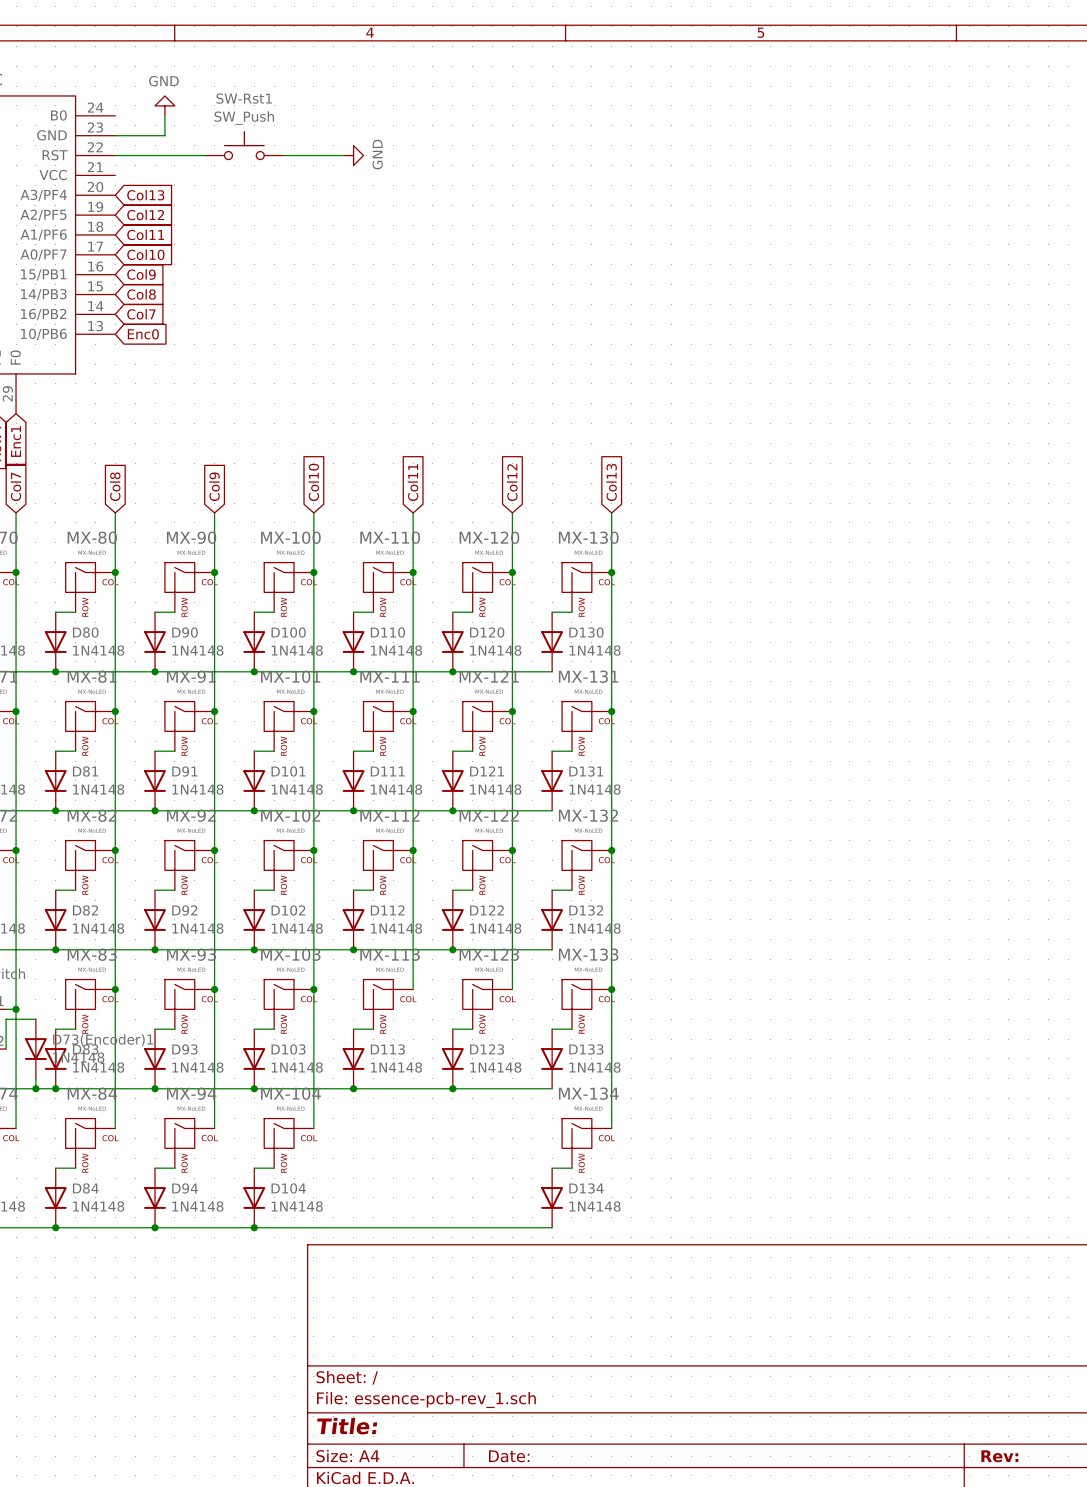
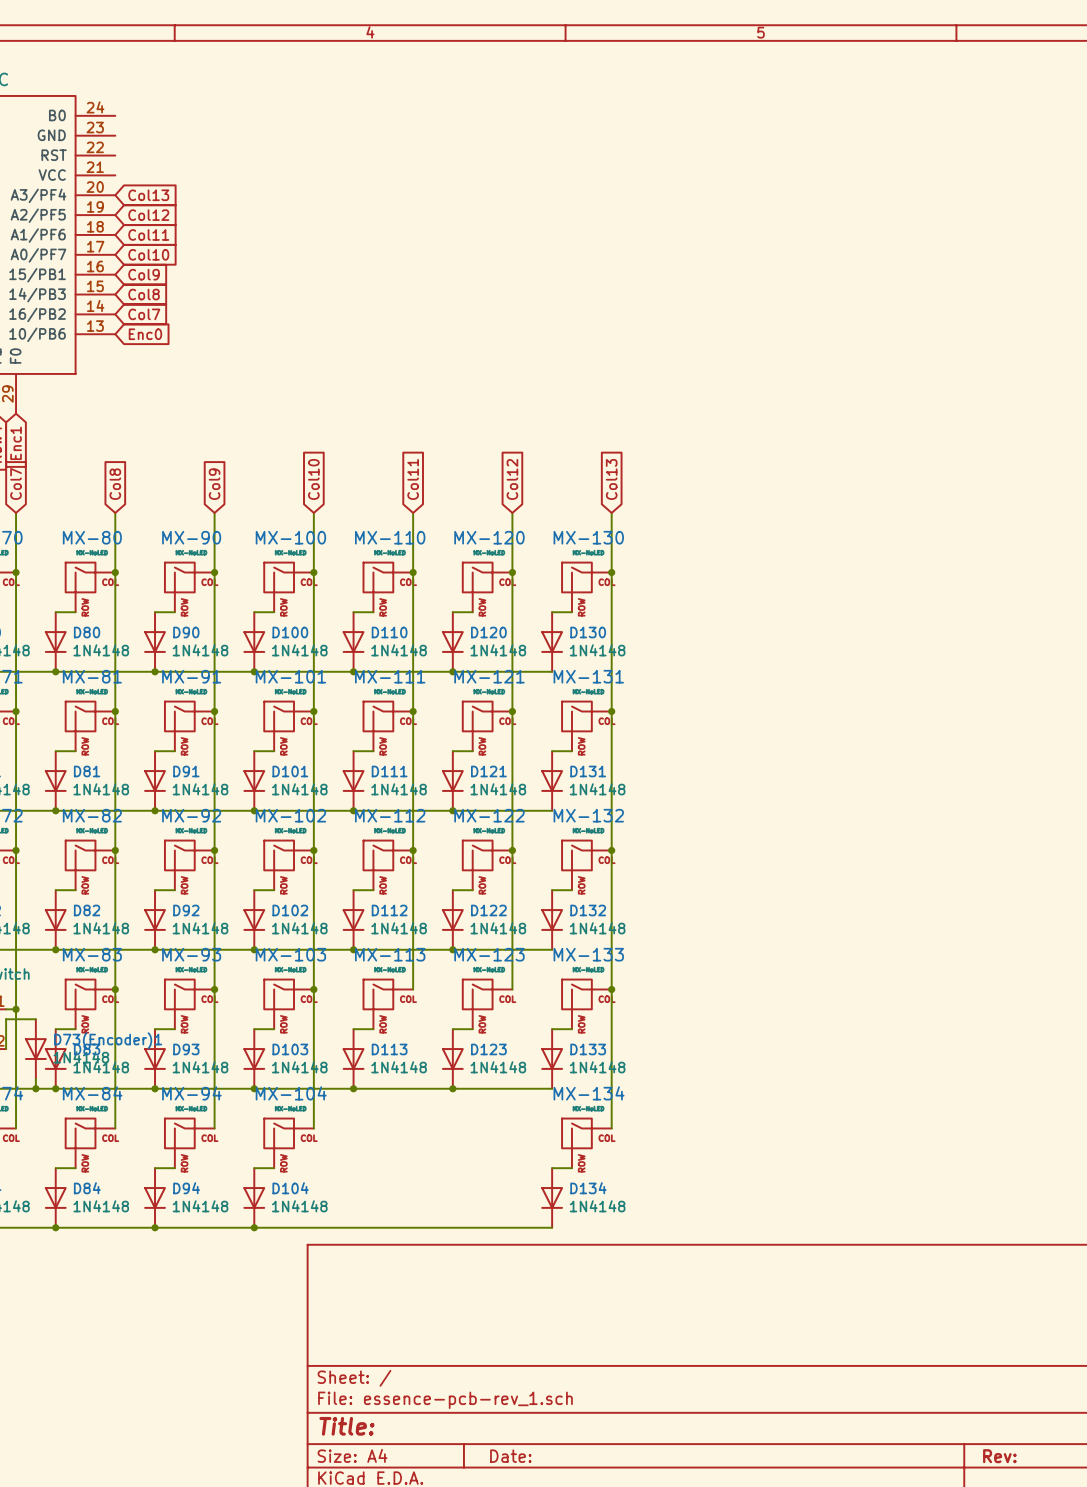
power symbol: GND (164, 105) -> none
wire: (164, 115) (164, 135) (115, 135) -> none
SW-Rst1: SW_Push (244, 145) -> none
wire: (115, 155) (204, 155) -> none
wire: (284, 155) (343, 155) -> none
power symbol: GND (353, 155) -> none

